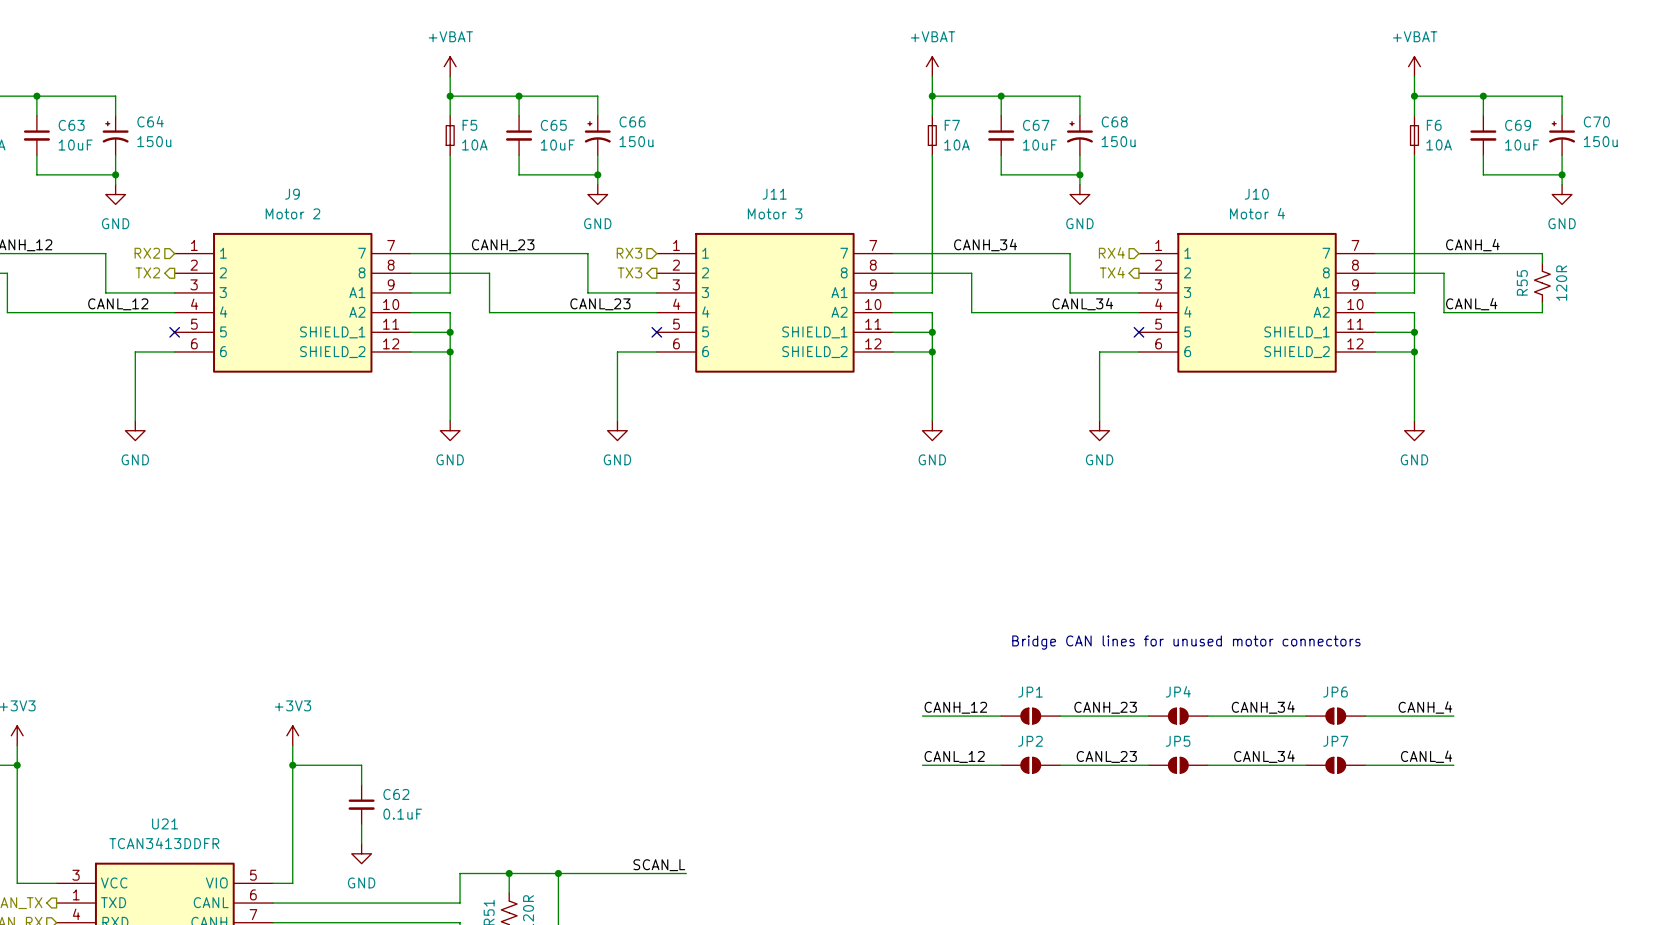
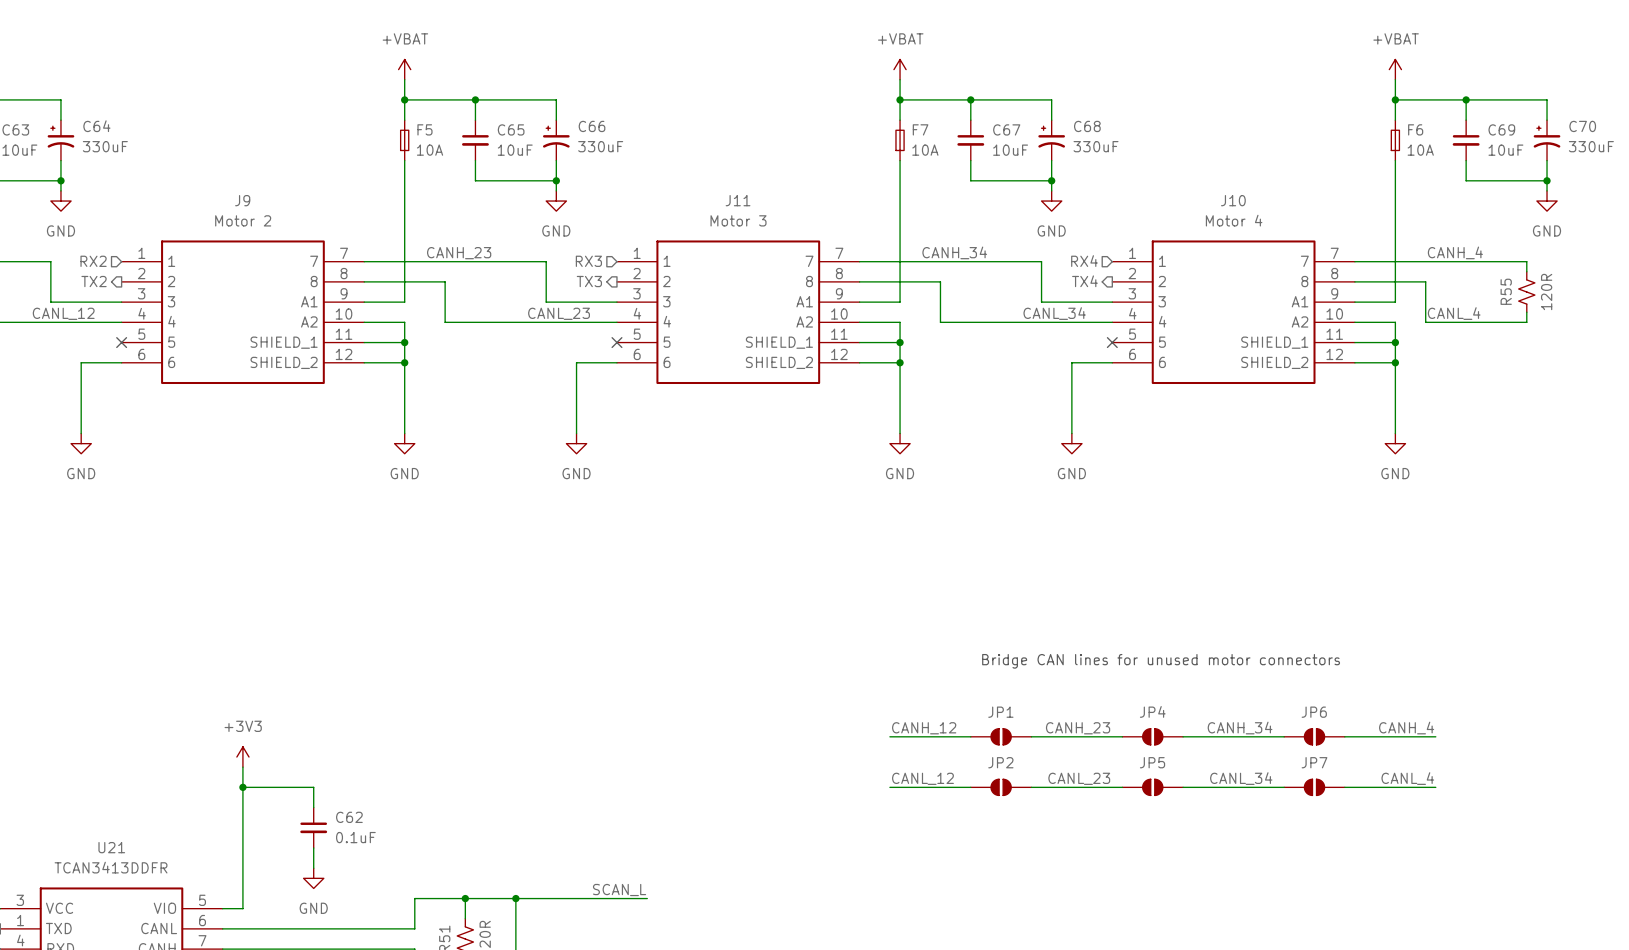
C64 value: 150u (154, 141) -> 330uF (105, 146)
C66 value: 150u (636, 141) -> 330uF (600, 146)
C68 value: 150u (1118, 141) -> 330uF (1096, 146)
C70 value: 150u (1600, 141) -> 330uF (1591, 146)

